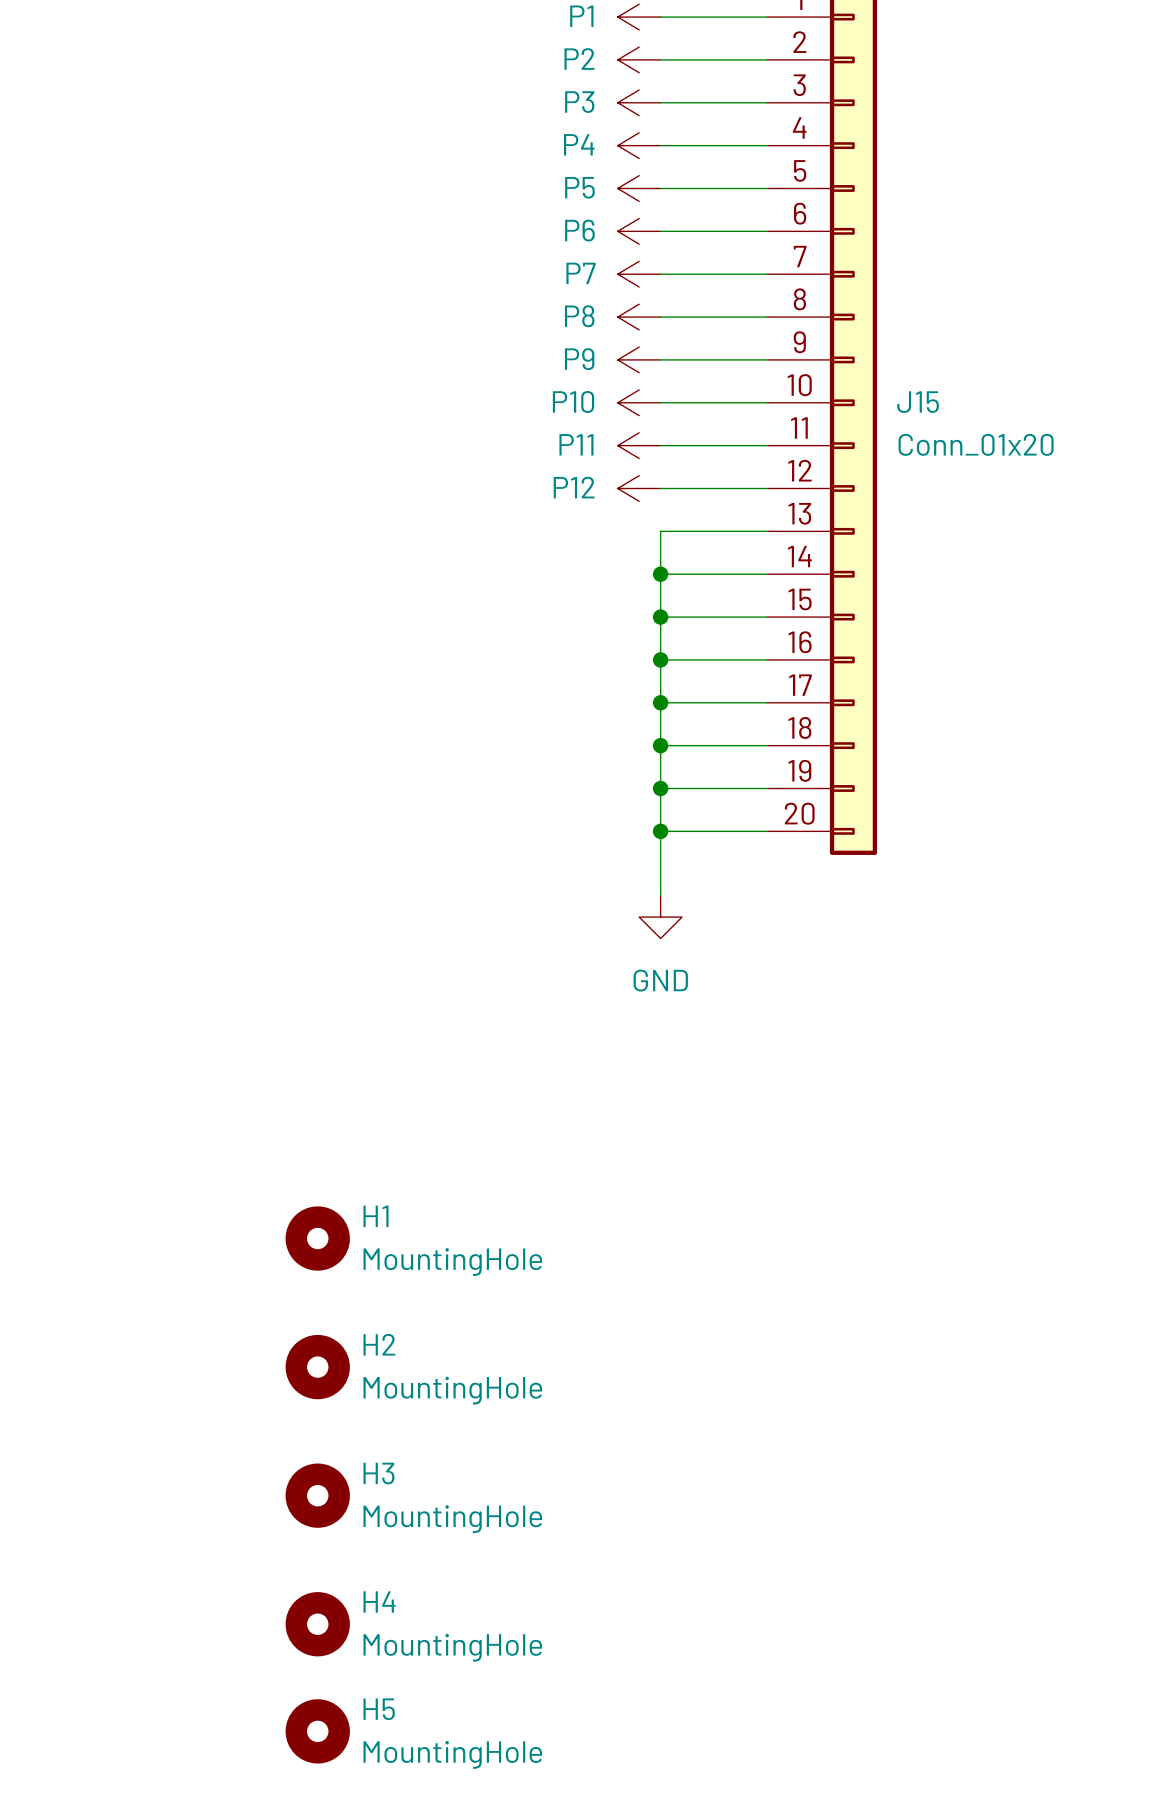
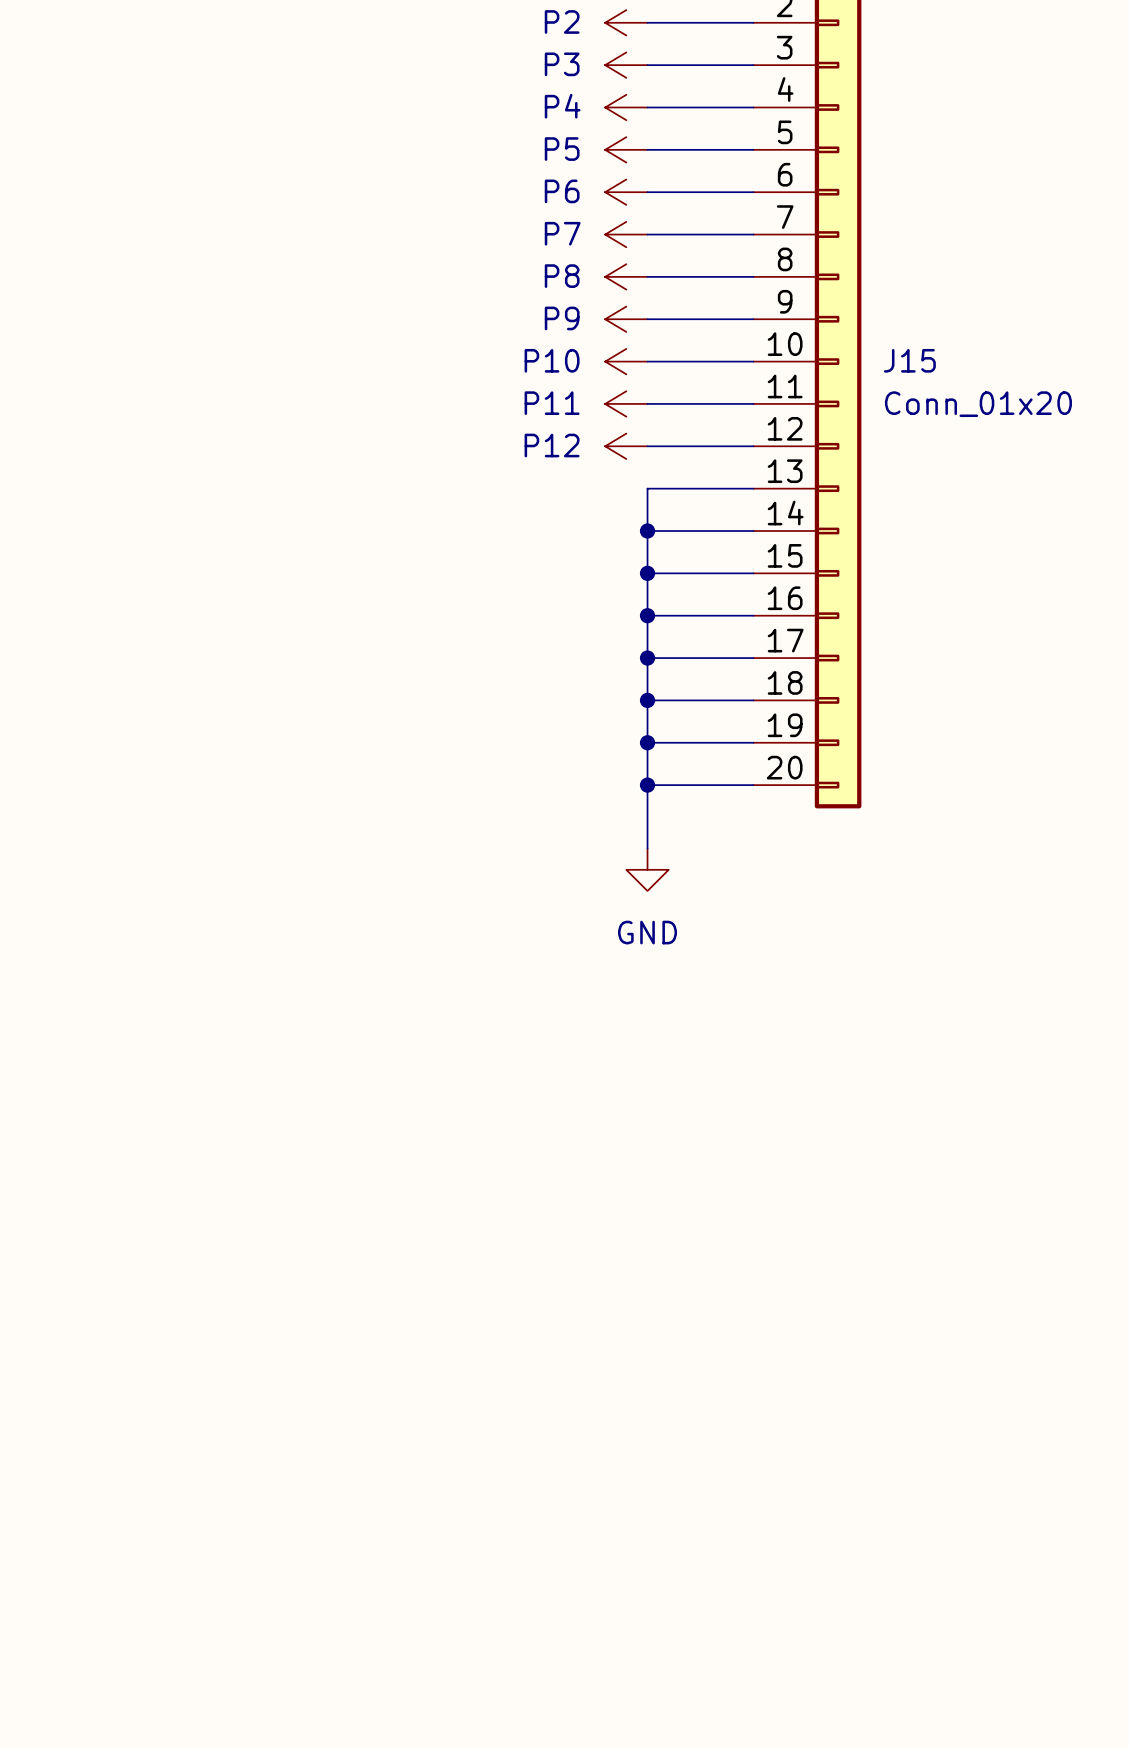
H1: MountingHole (317, 1238) -> none
H2: MountingHole (317, 1367) -> none
H3: MountingHole (317, 1495) -> none
H4: MountingHole (317, 1624) -> none
H5: MountingHole (317, 1731) -> none

